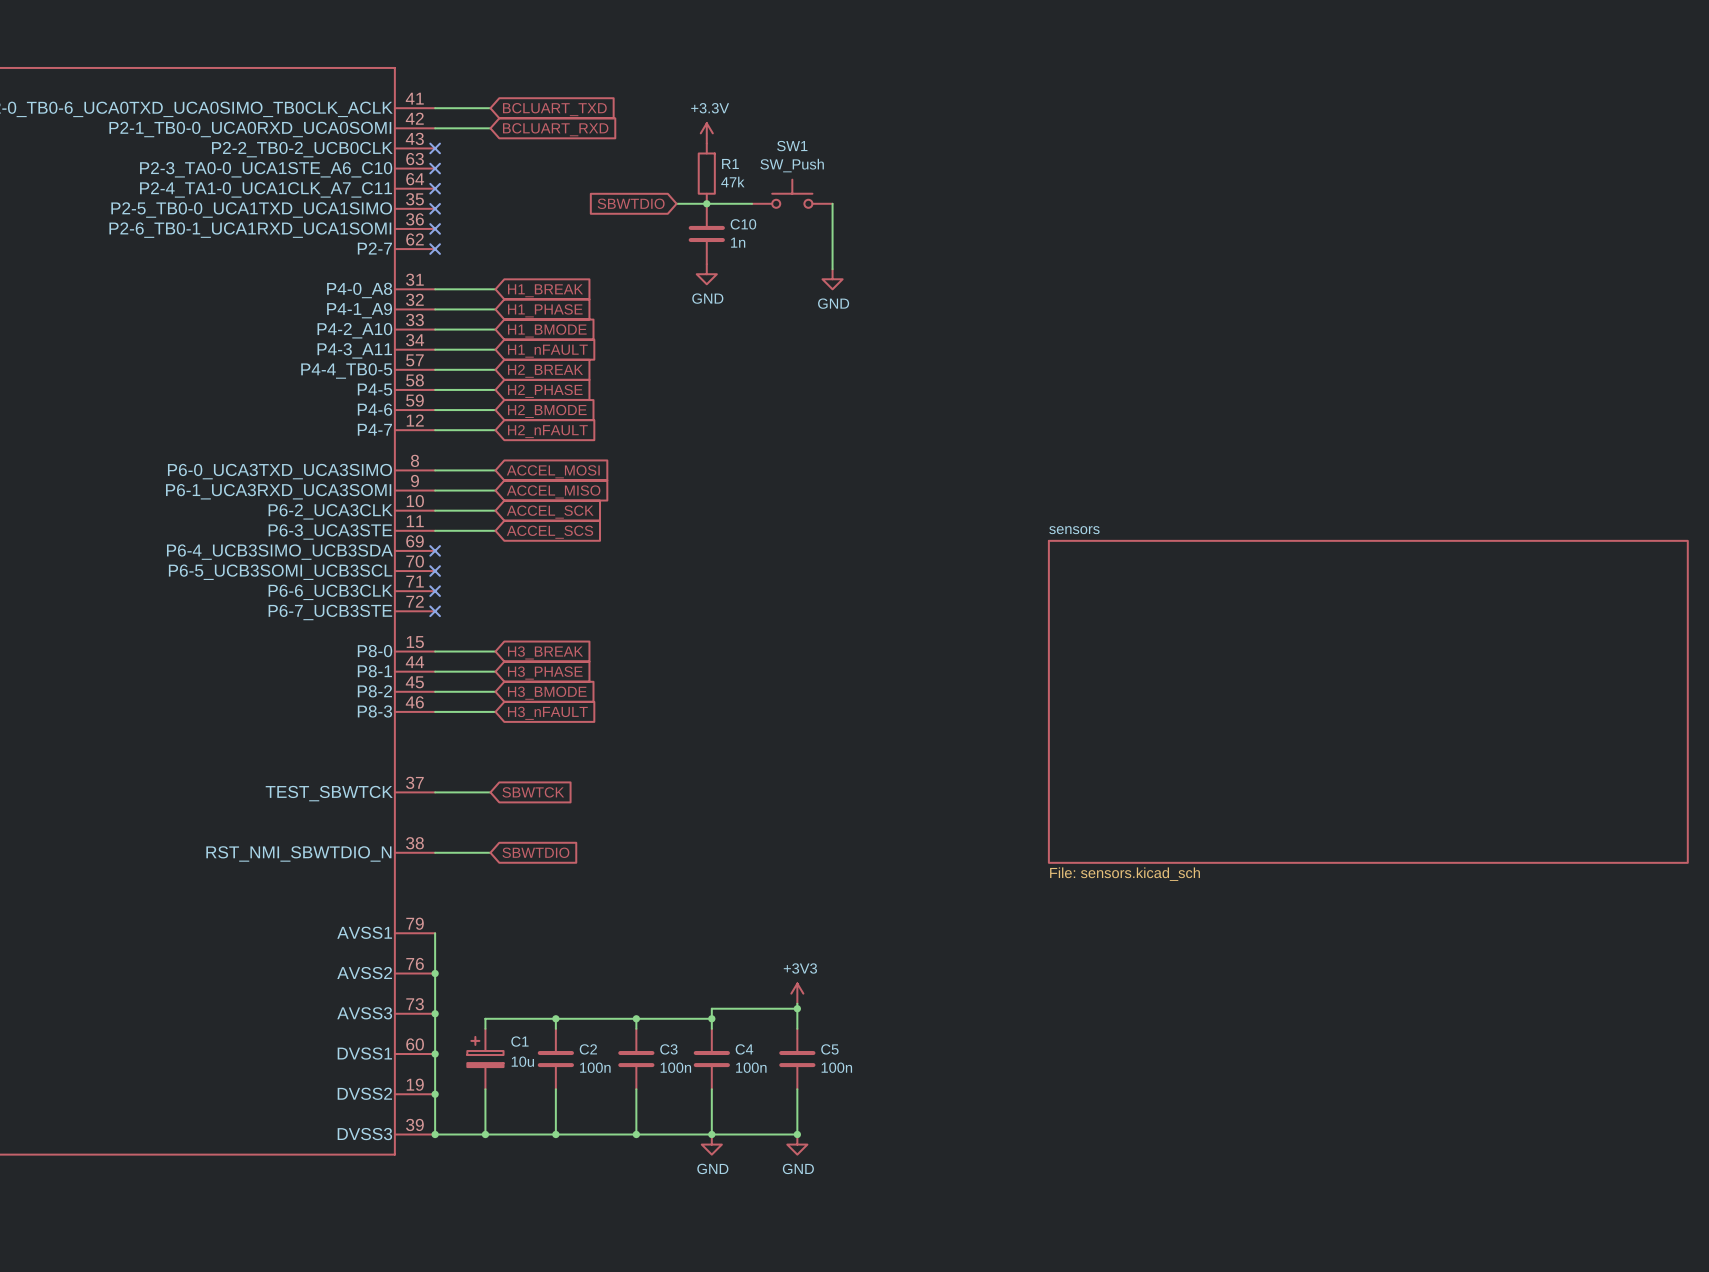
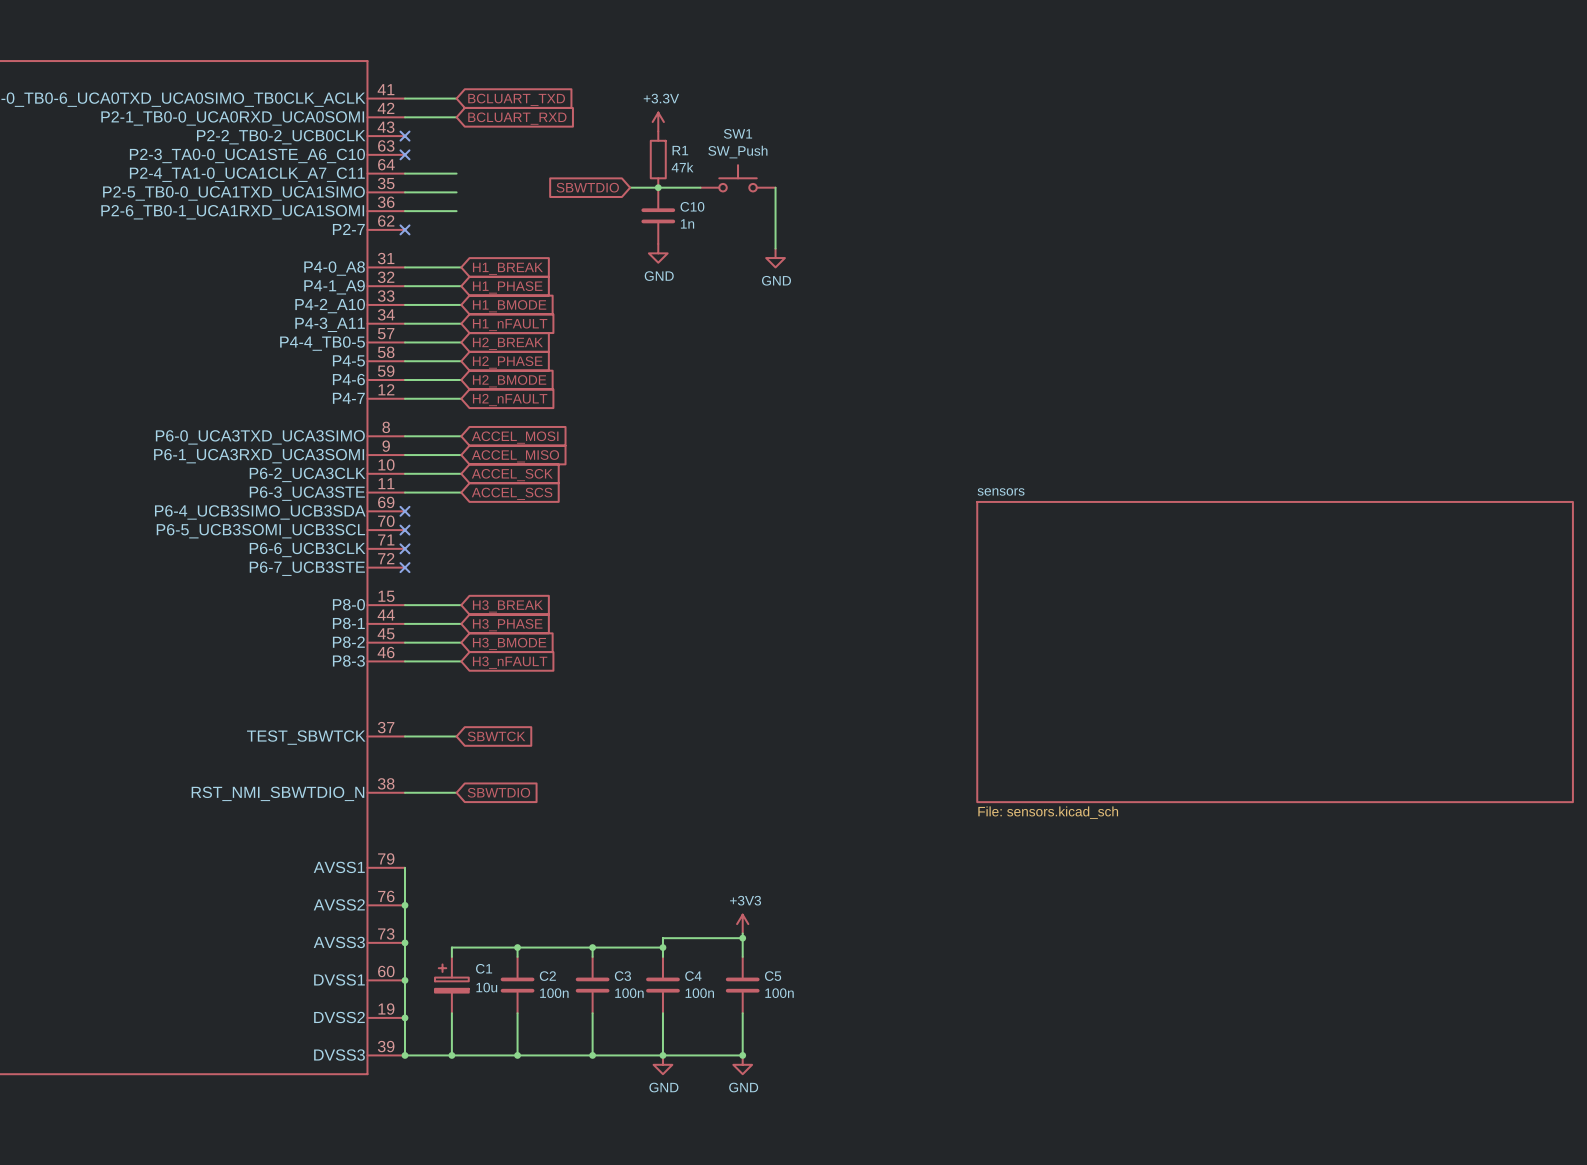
wire: none -> (404, 173) (456, 173)
no-connect mark: (435, 188) -> none
wire: none -> (404, 192) (456, 192)
no-connect mark: (435, 208) -> none
wire: none -> (404, 211) (456, 211)
no-connect mark: (435, 228) -> none

